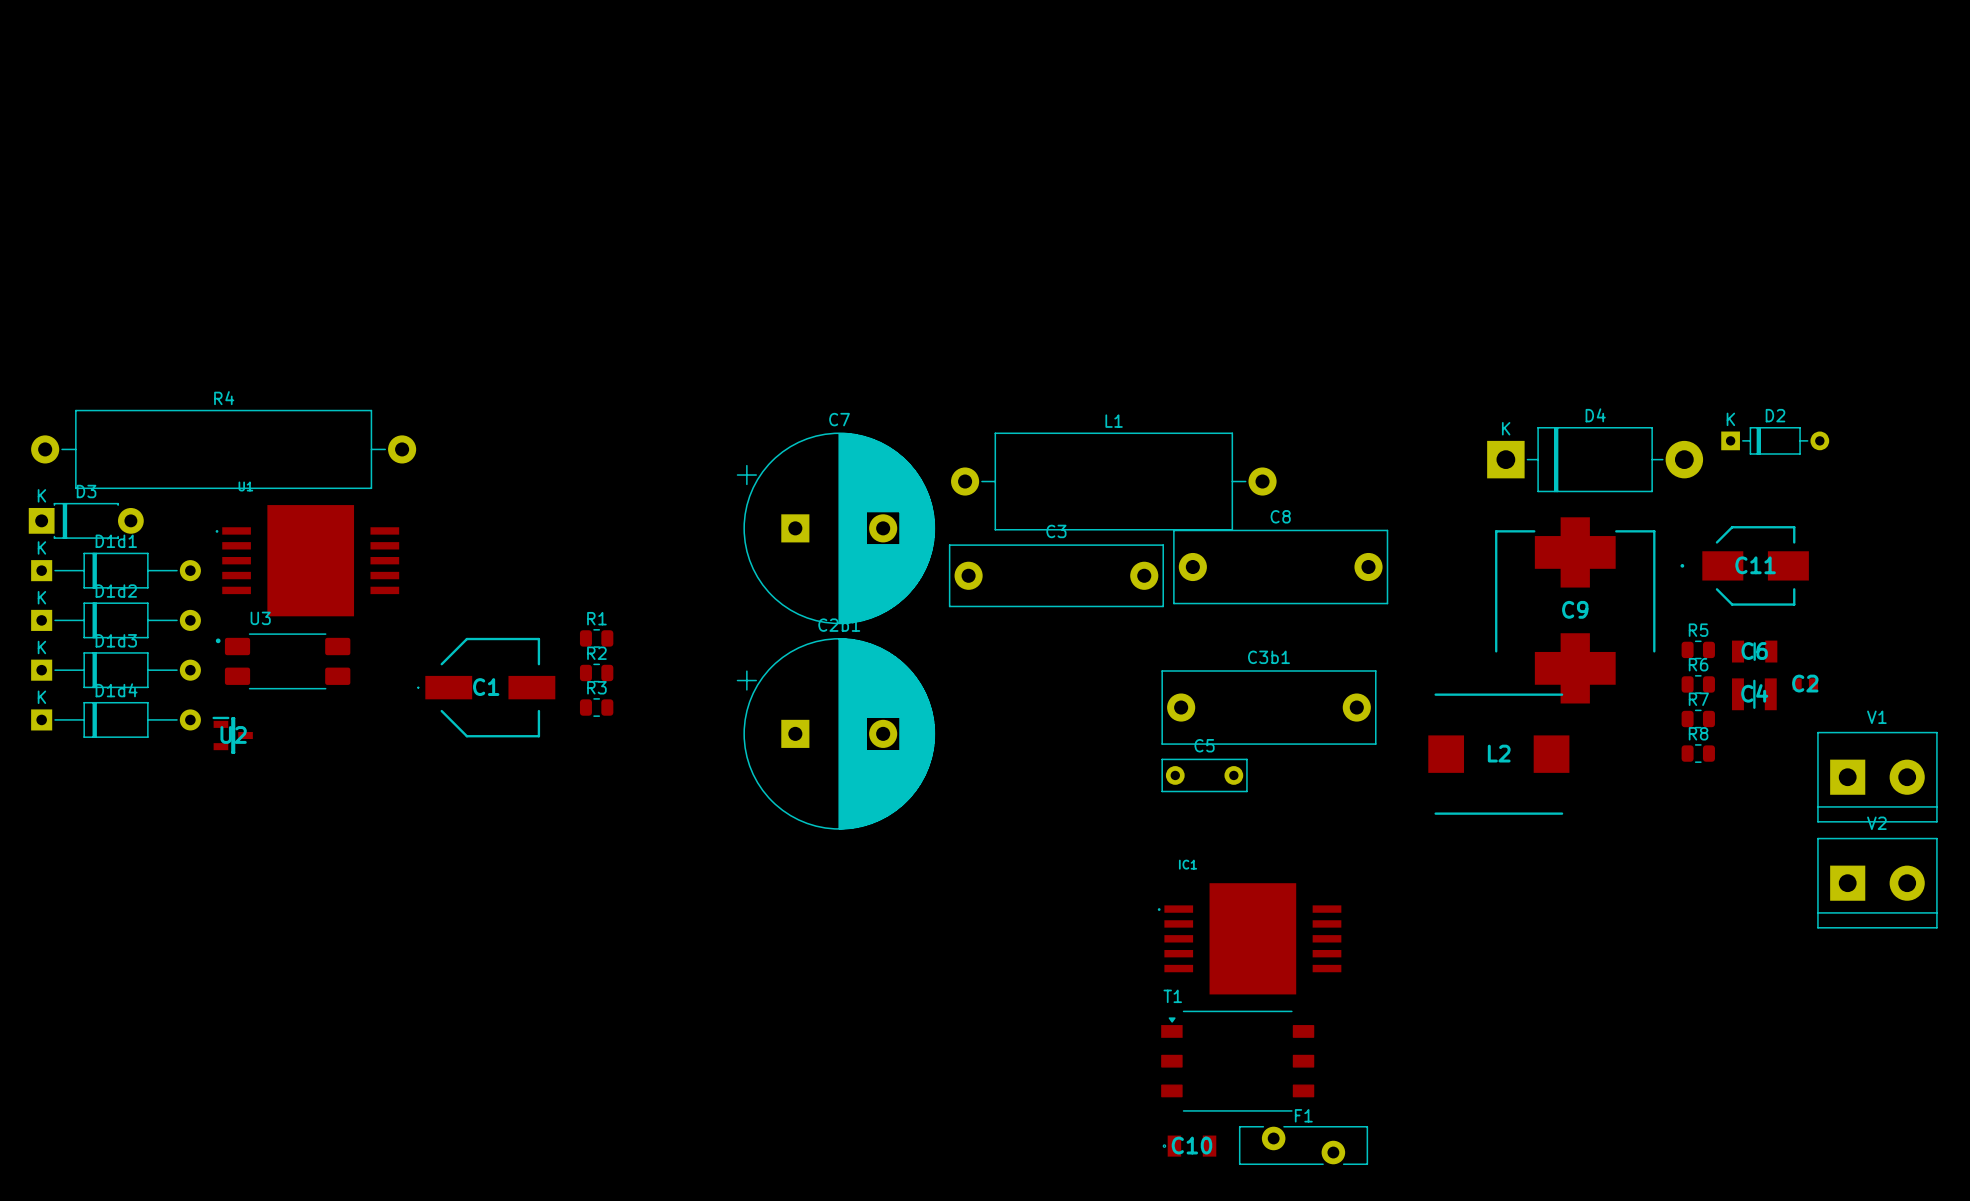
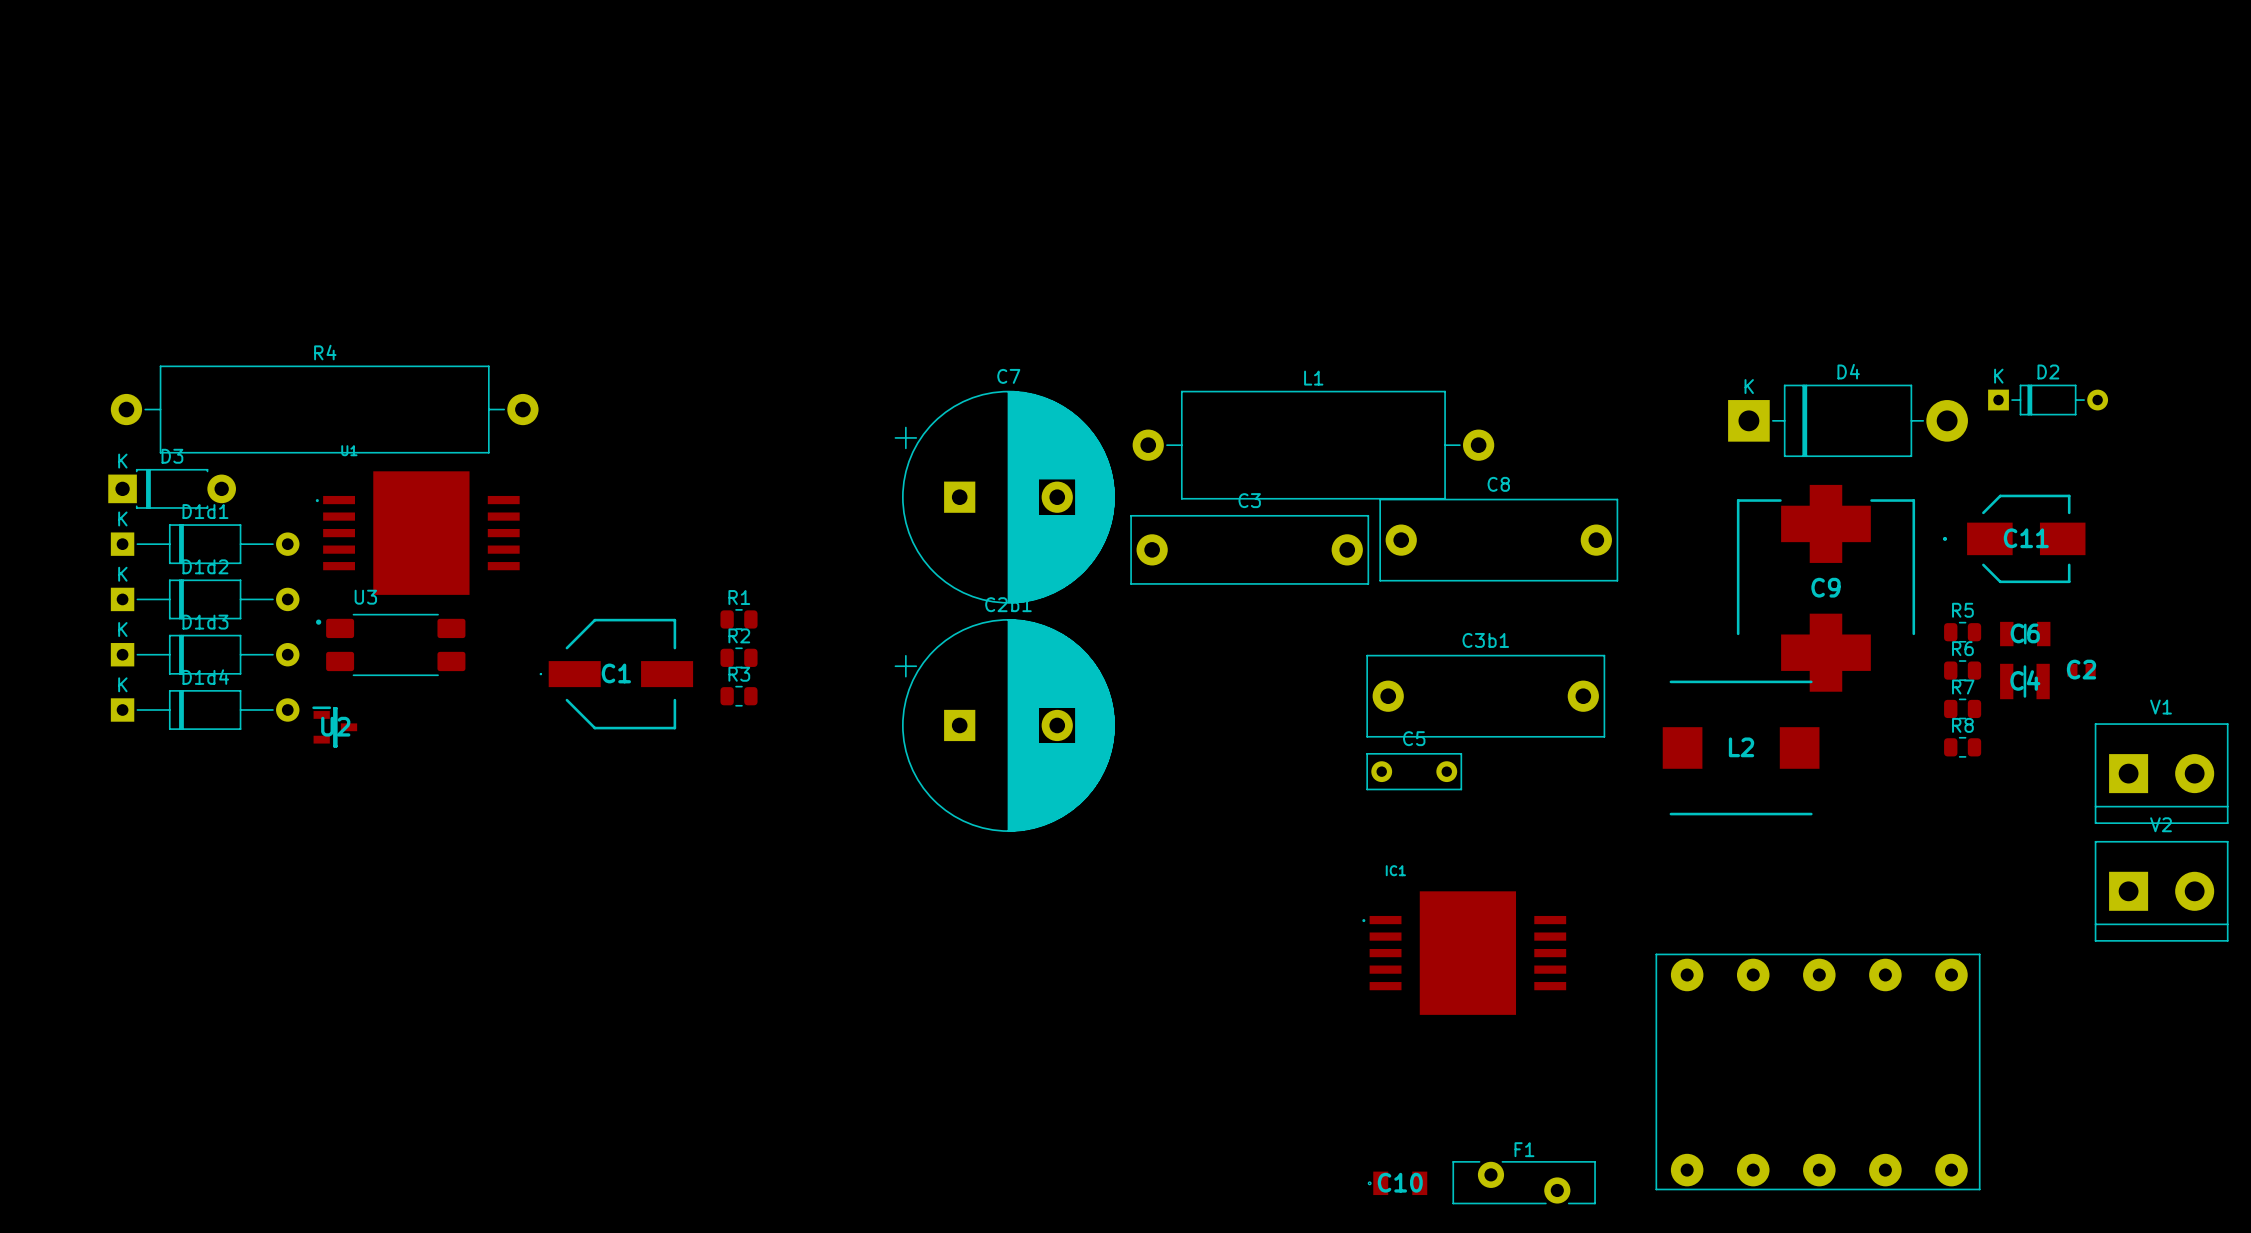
part: none -> (1818, 1071)
T1: (1237, 1061) -> none

